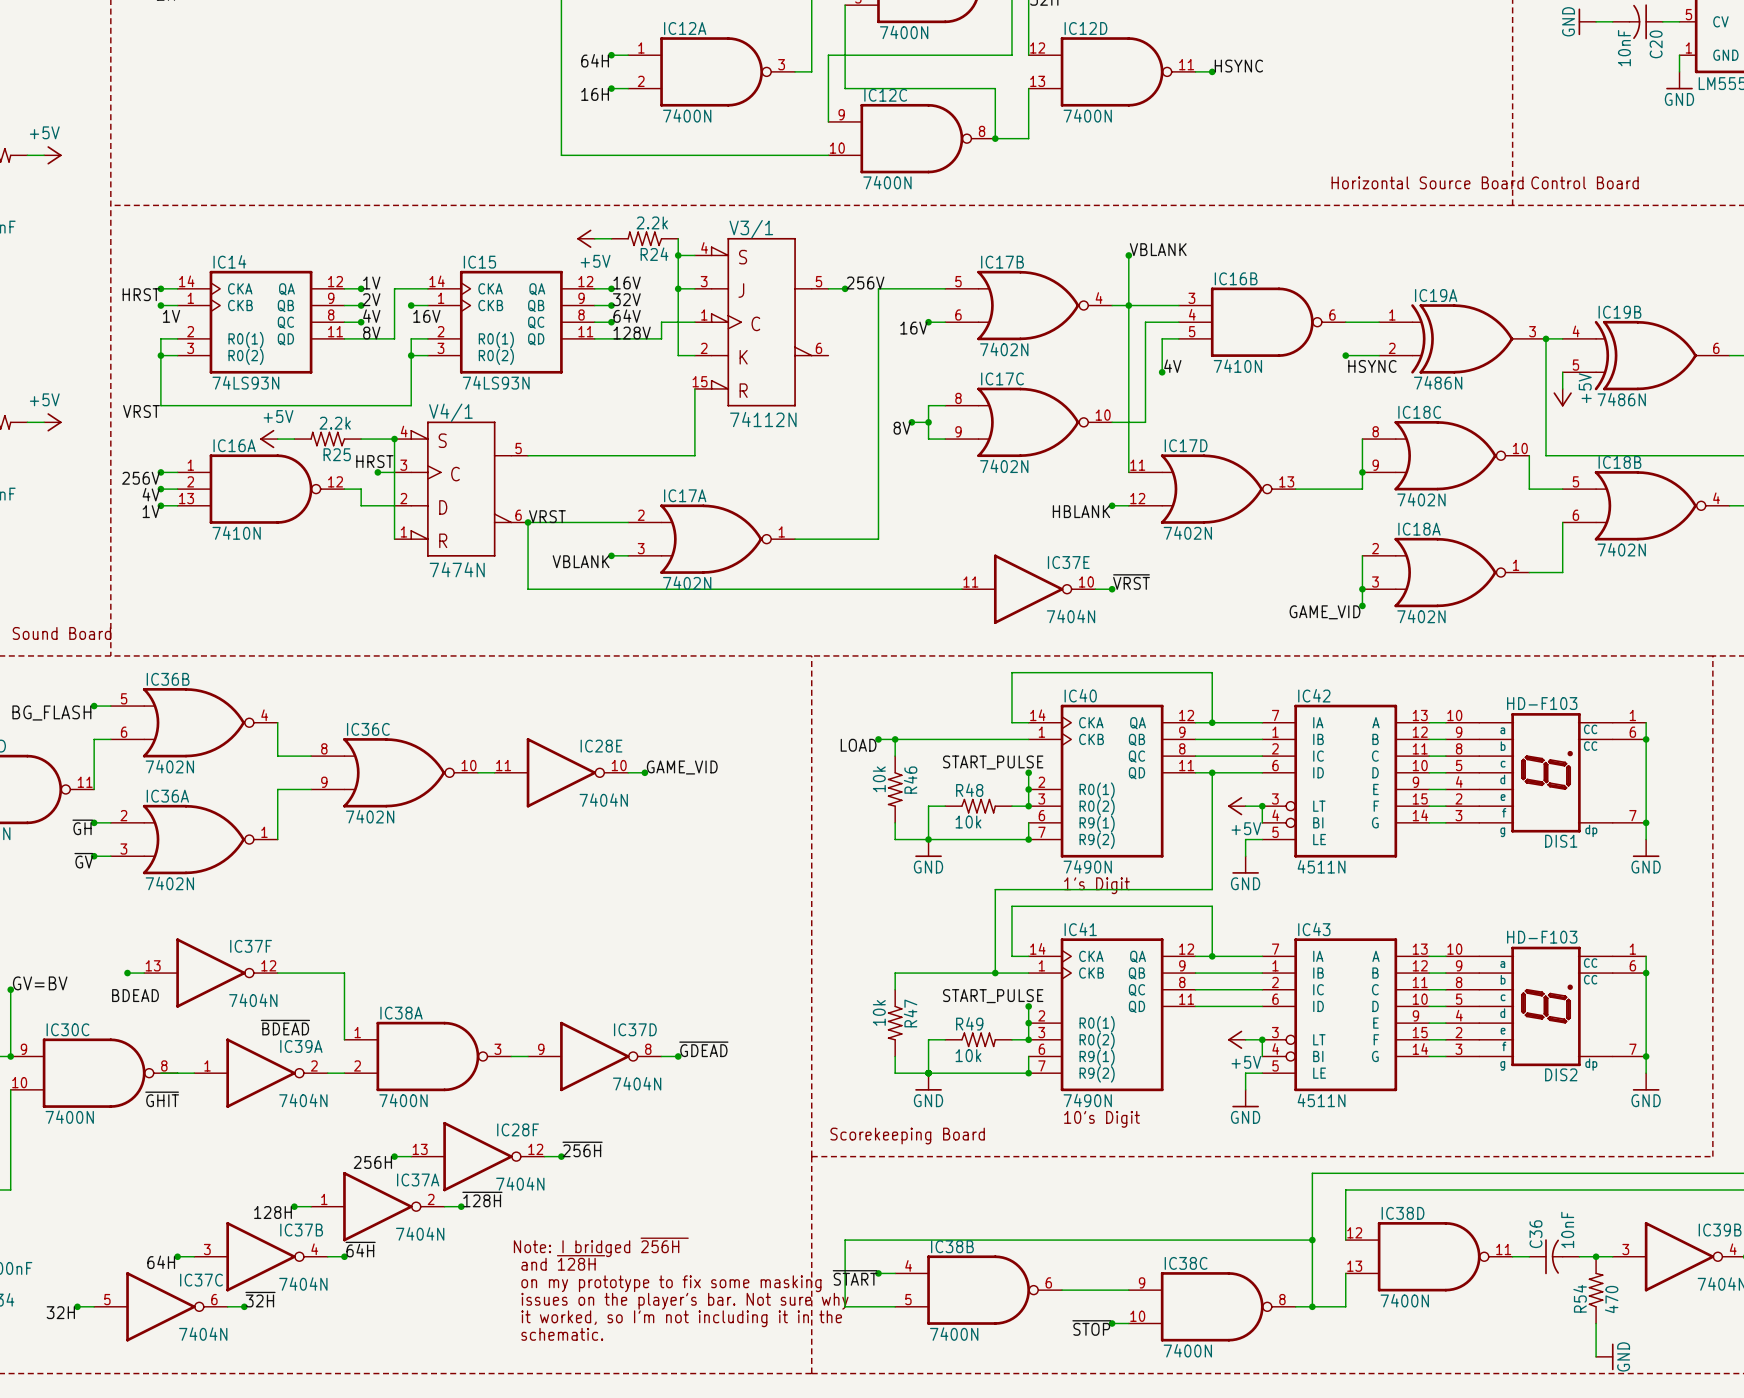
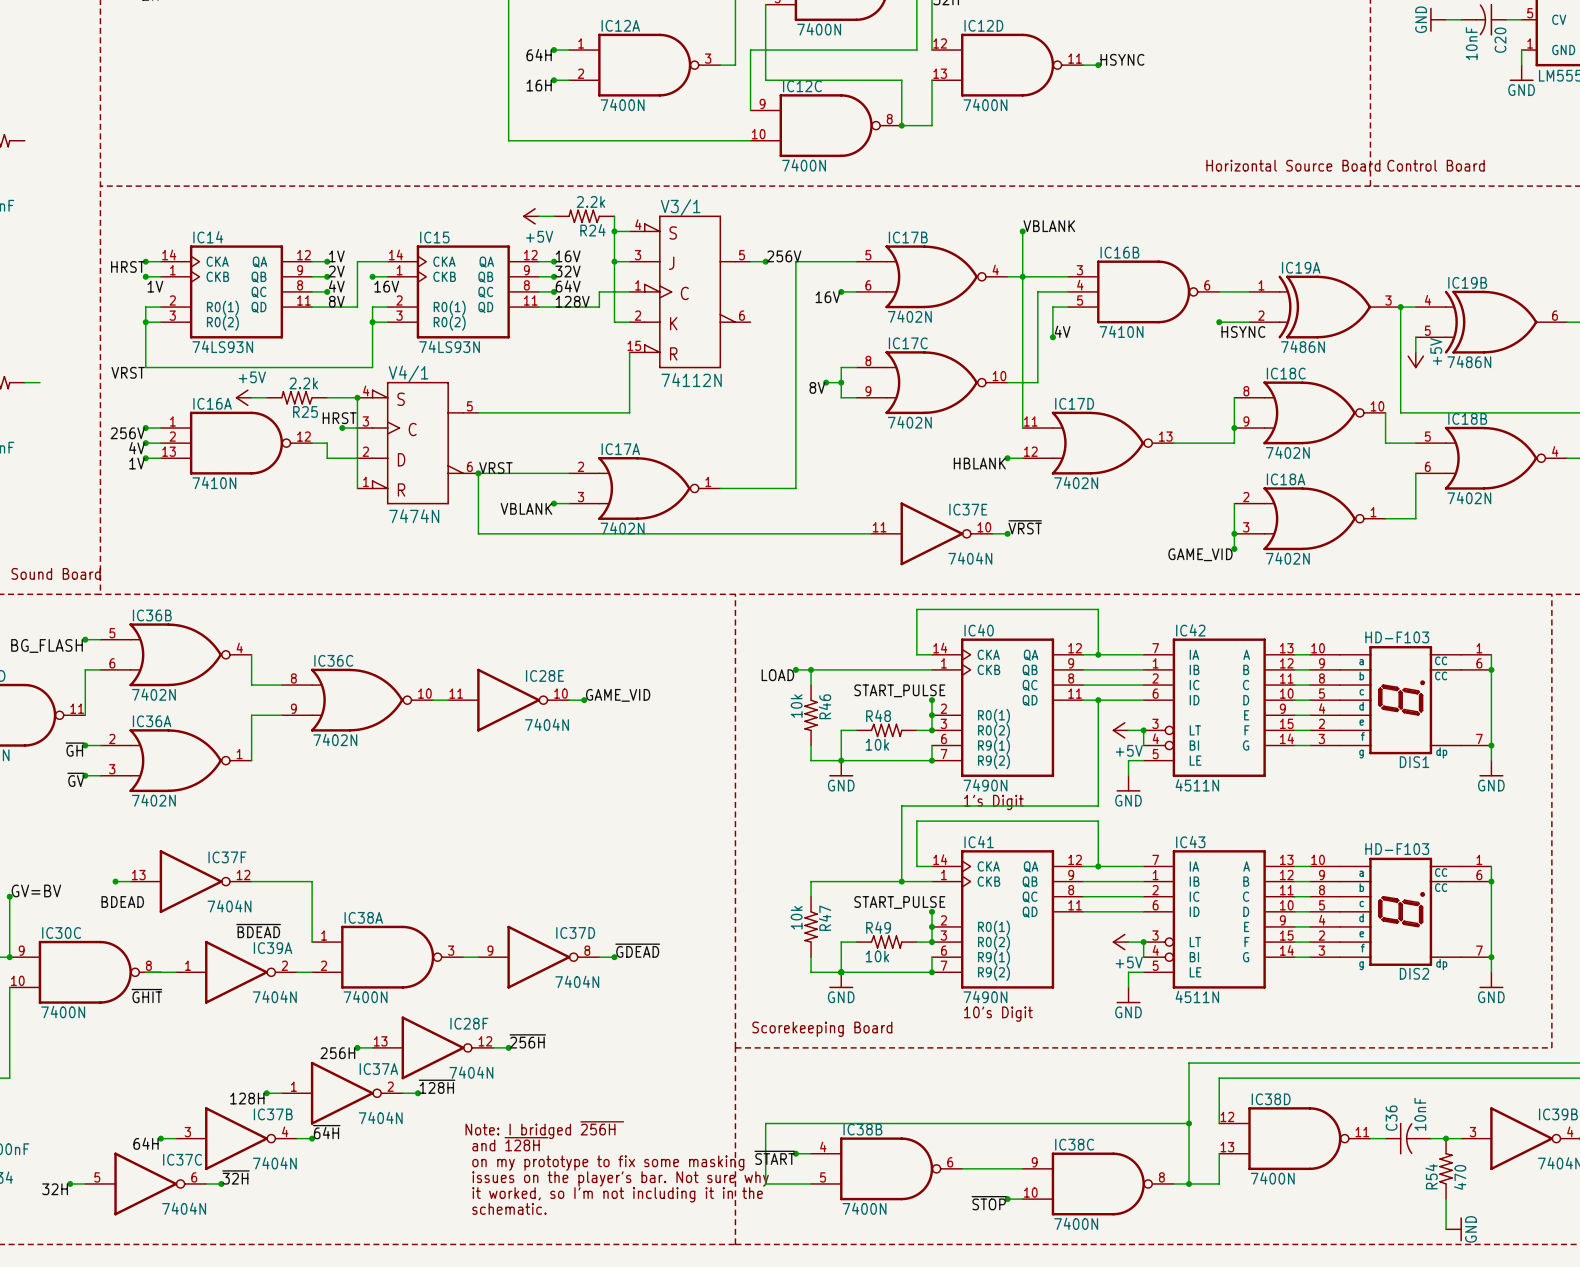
wire: (27, 155) (44, 155) -> none
power symbol: +5V (52, 155) -> none
power symbol: +5V (52, 422) -> none

